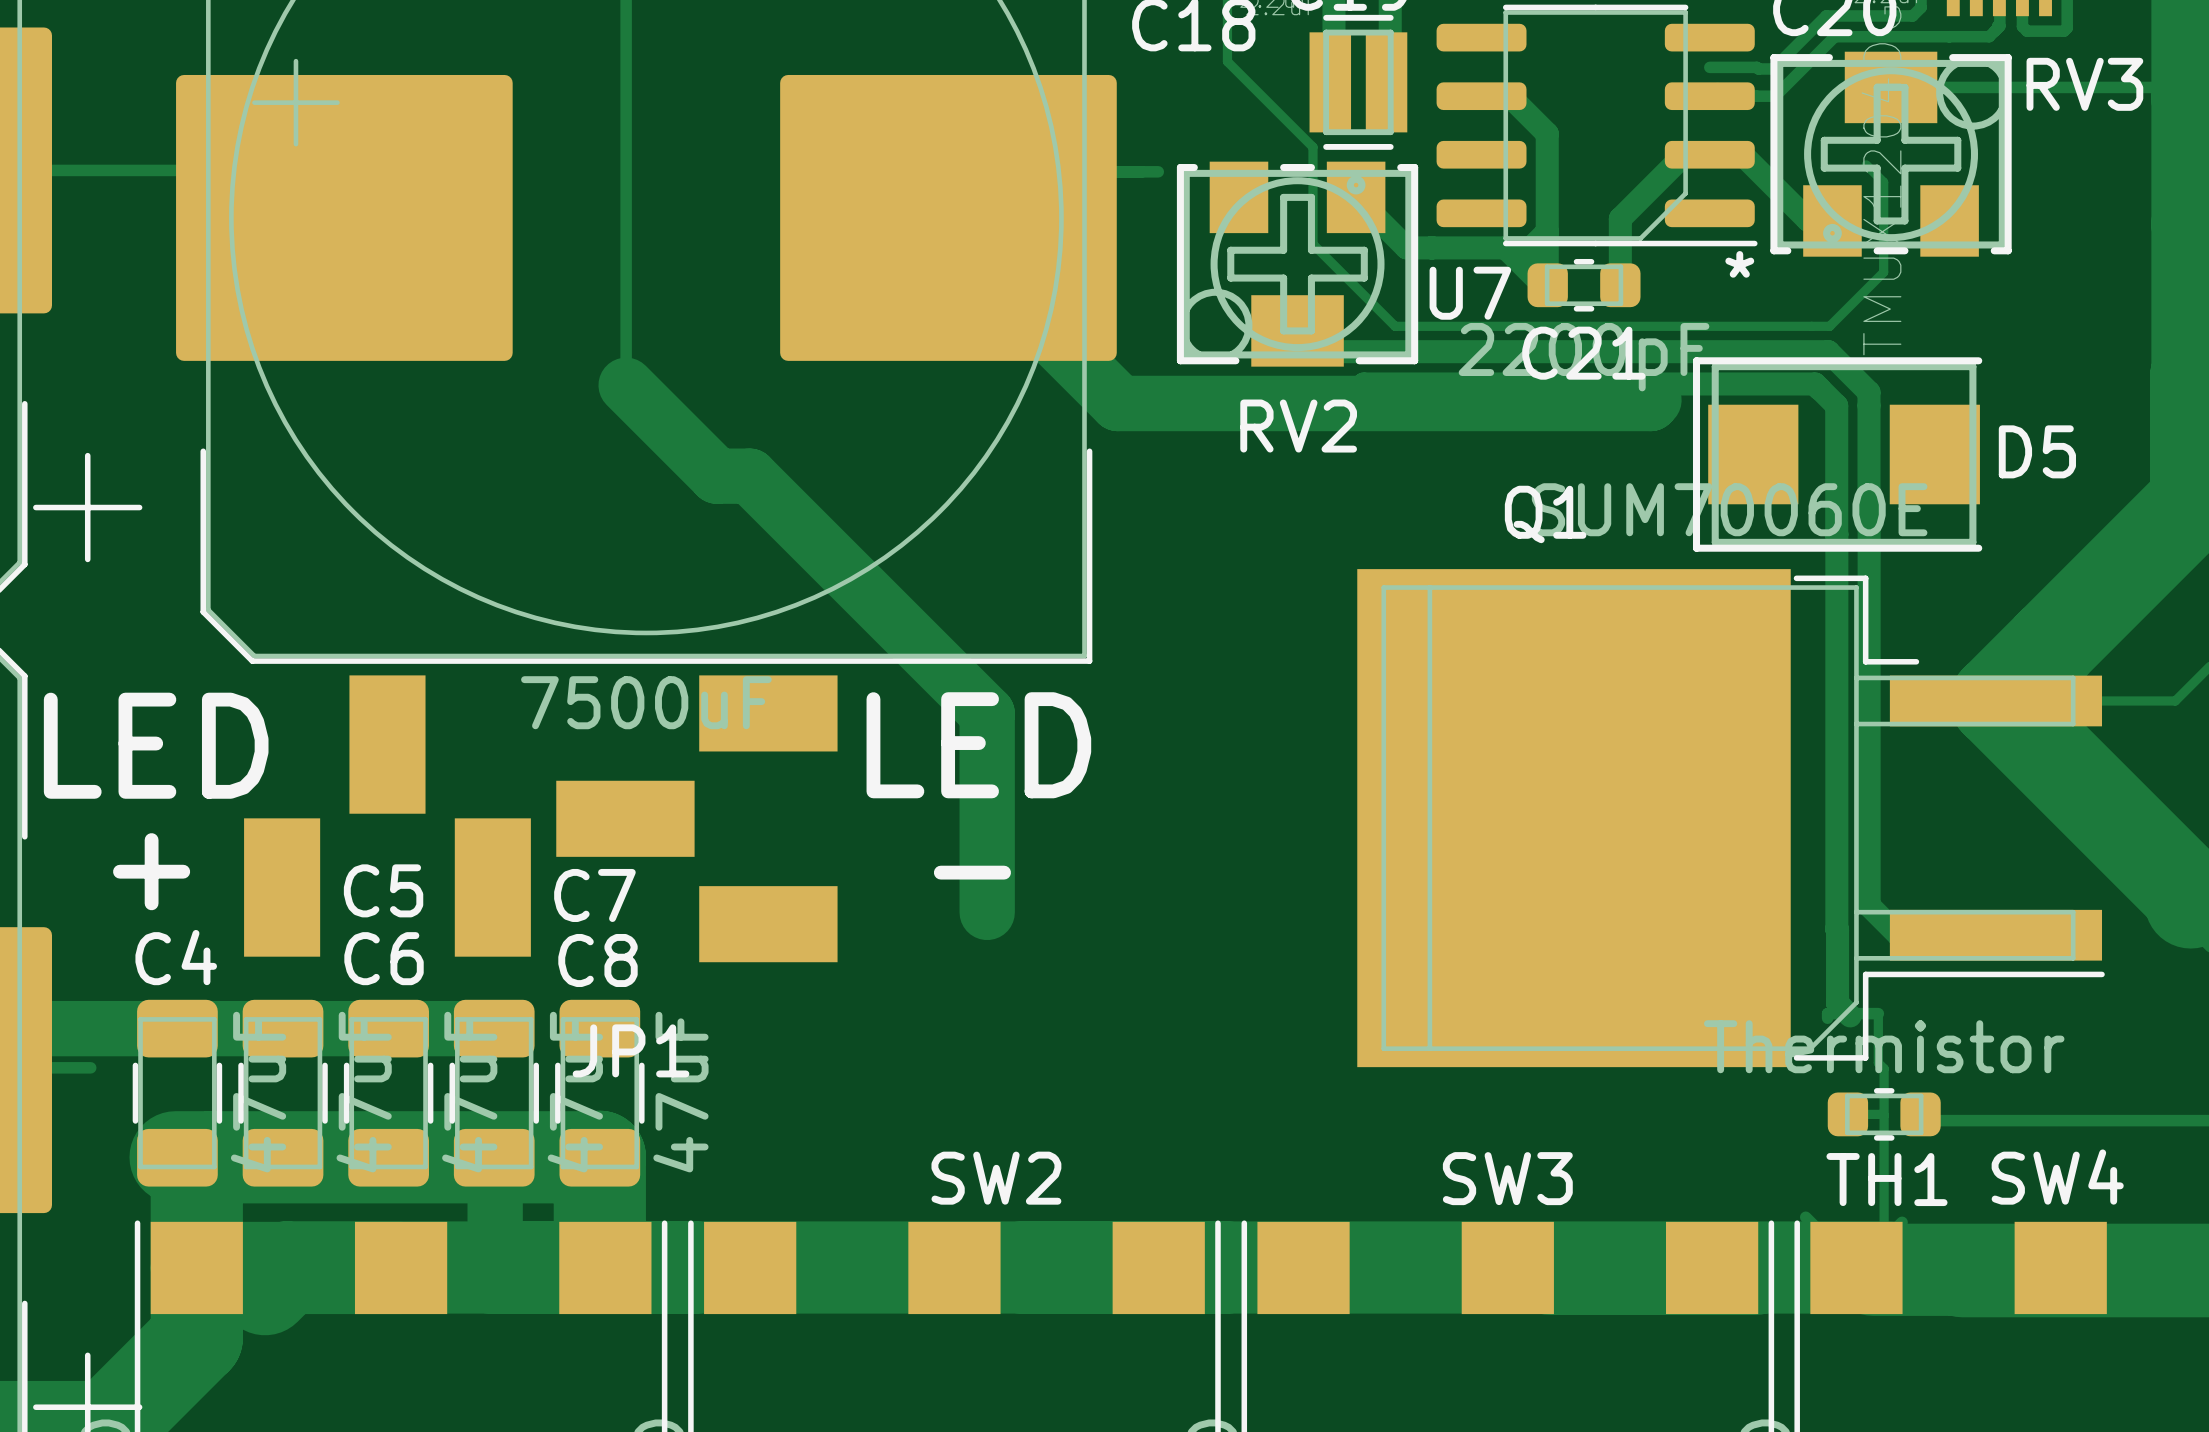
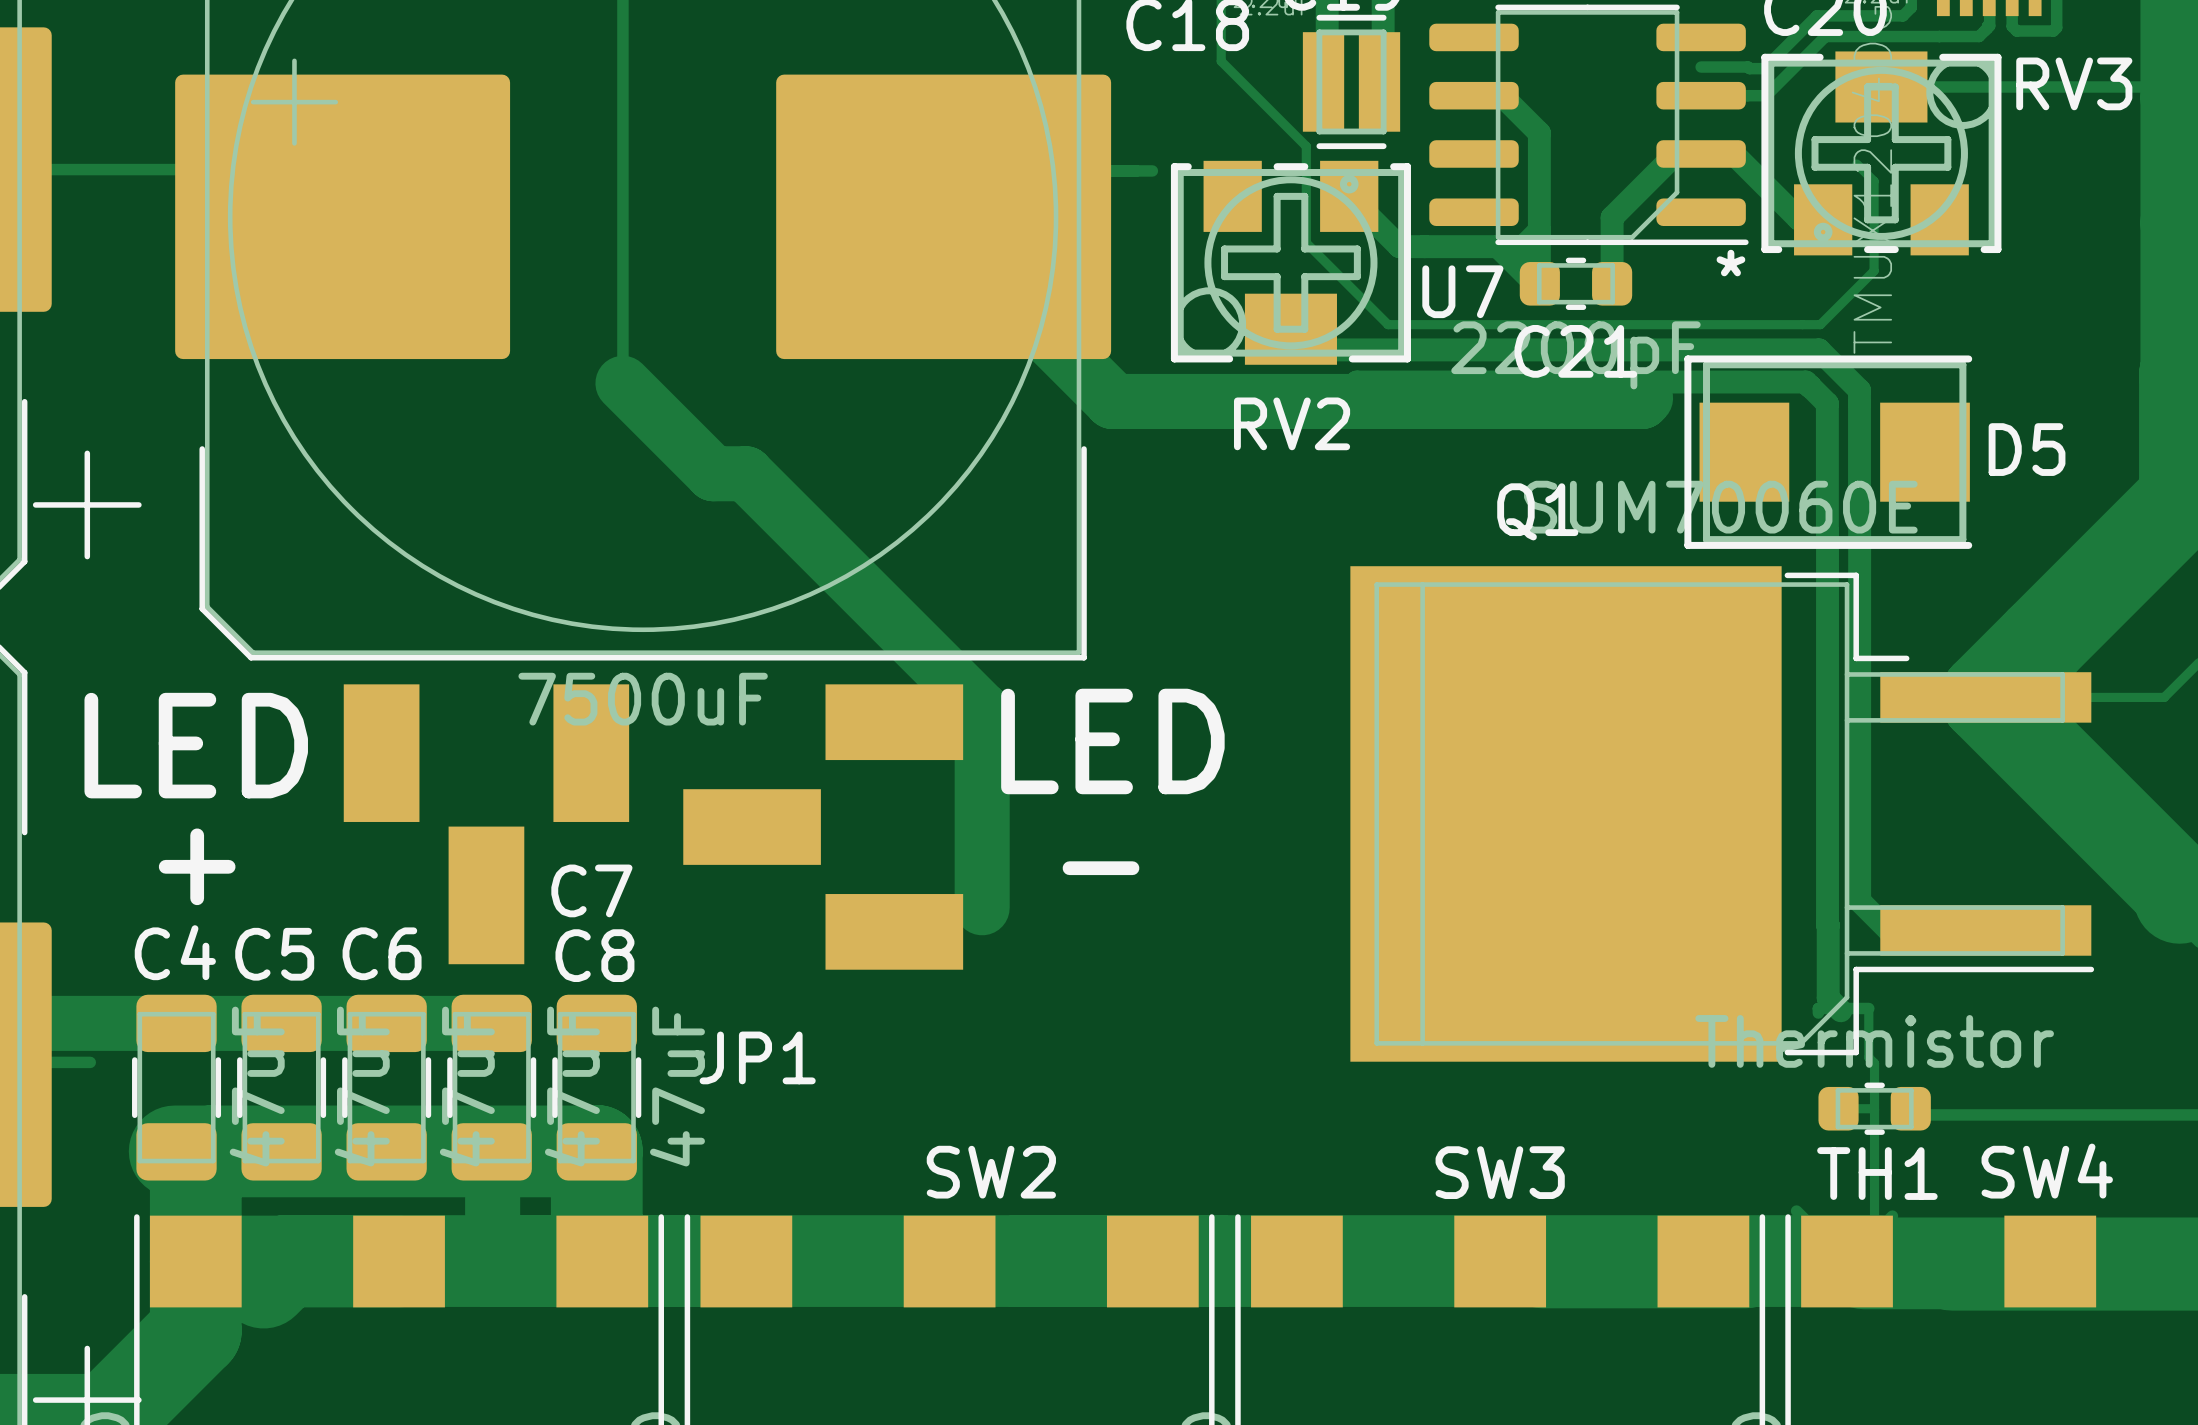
JP1 footprint: [244, 675, 838, 963] -> [343, 684, 964, 970]
text position: LED (156, 745) -> LED (196, 745)
text position: LED (978, 745) -> LED (1112, 741)
text position: + (151, 871) -> + (197, 866)
text position: - (972, 872) -> - (1101, 868)
C5 name position: C5 (383, 890) -> C5 (274, 954)

